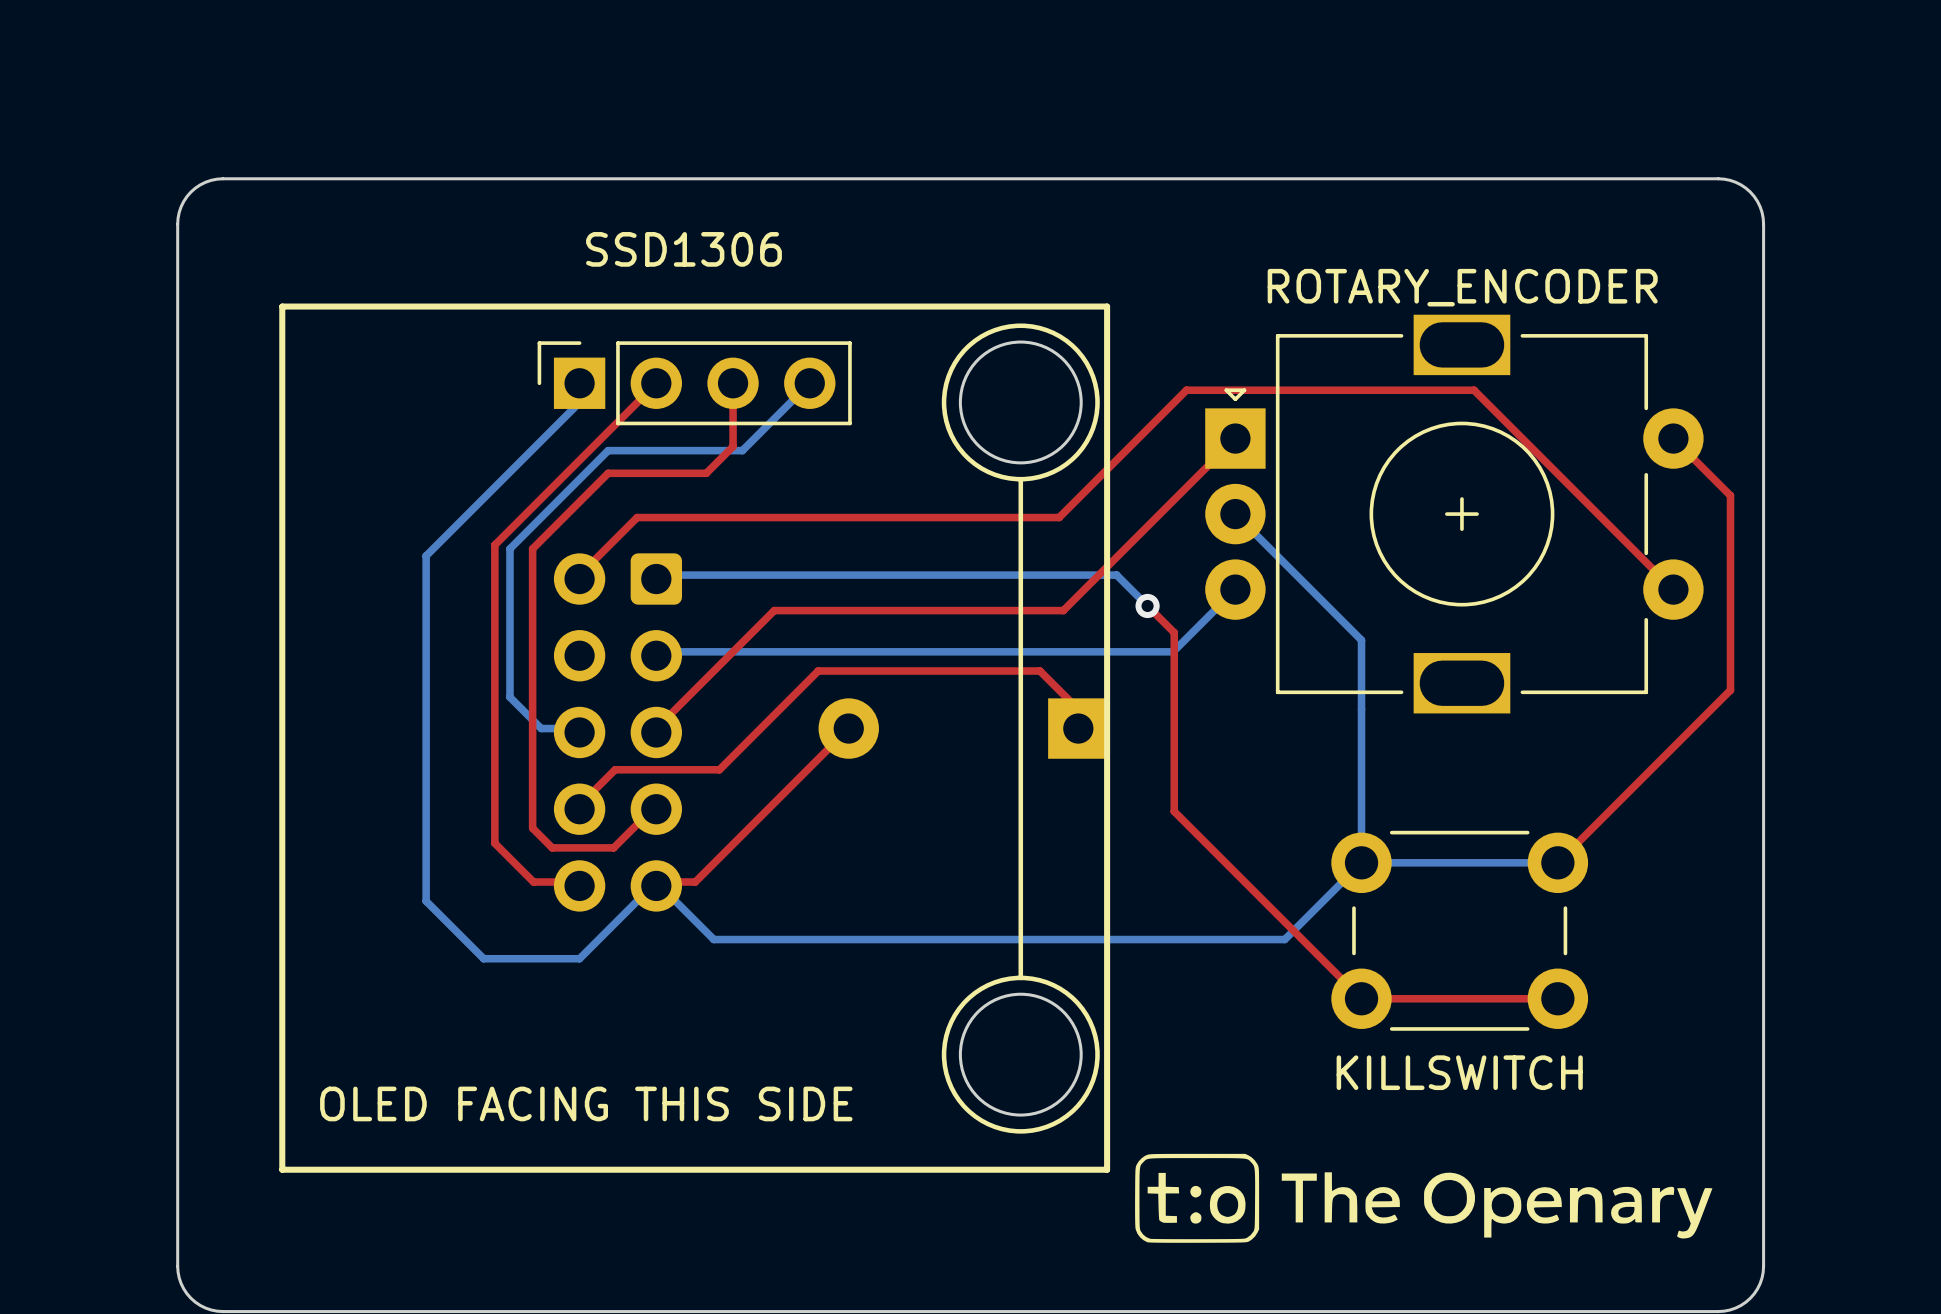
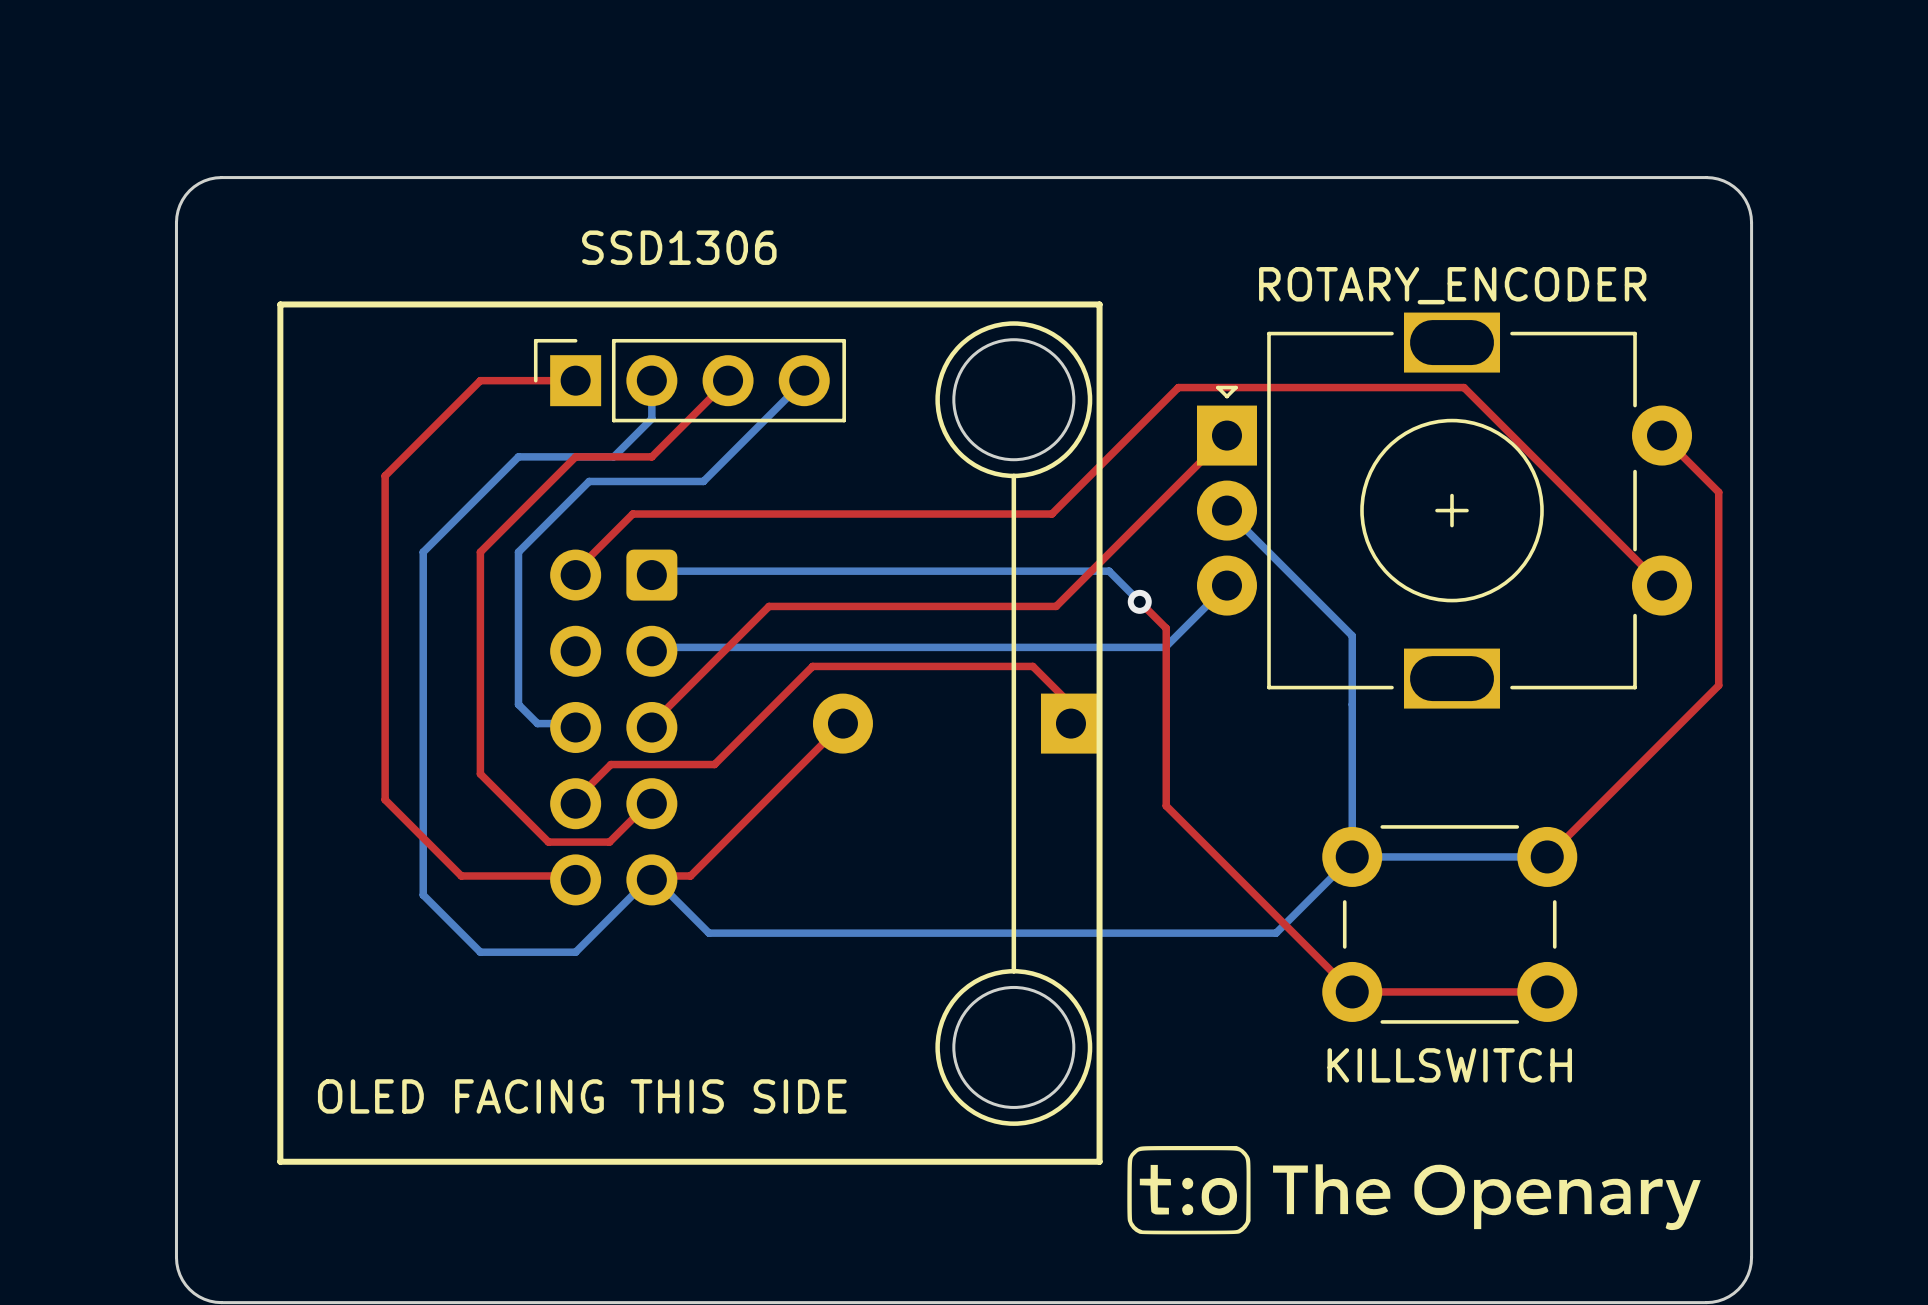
bottom track: (579, 383) (579, 402) (522, 460) -> (651, 380) (651, 418) (613, 456) (518, 456)
top track: (656, 383) (494, 545) (494, 843) (533, 882) -> (575, 380) (480, 380) (385, 475) (385, 799) (461, 875) (529, 875)
top track: (733, 383) (733, 446) (706, 473) (608, 473) (532, 548) (532, 828) -> (728, 380) (651, 456) (575, 456) (480, 552) (480, 773) (529, 822)
bottom track: (742, 450) (608, 450) (509, 548) (509, 697) (522, 709) -> (737, 447) (703, 481) (589, 481) (518, 552) (518, 704)

